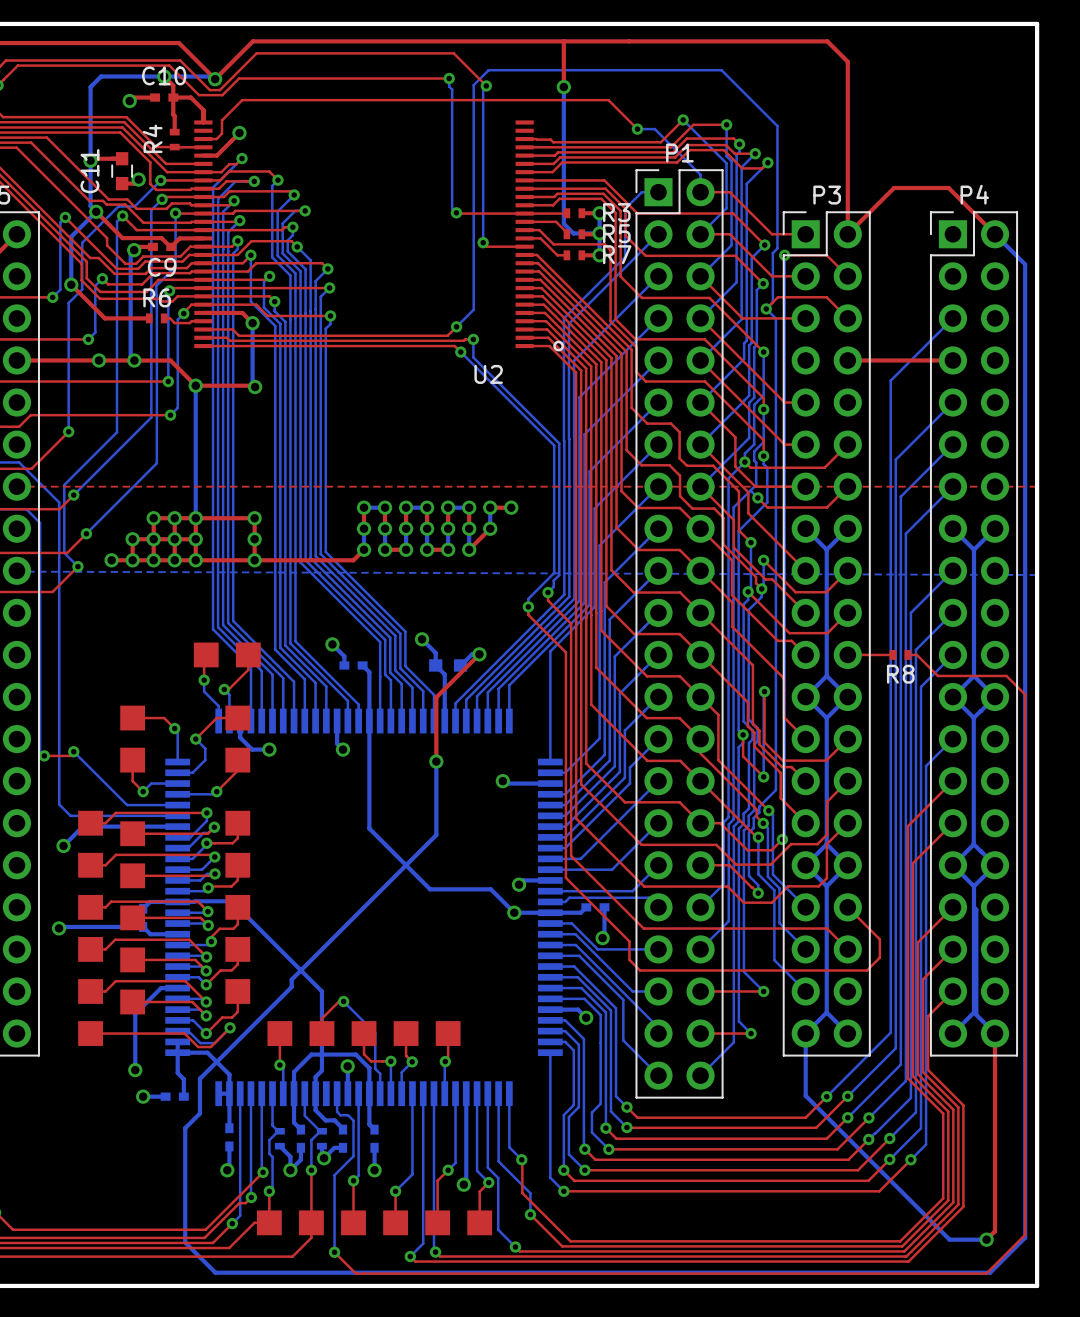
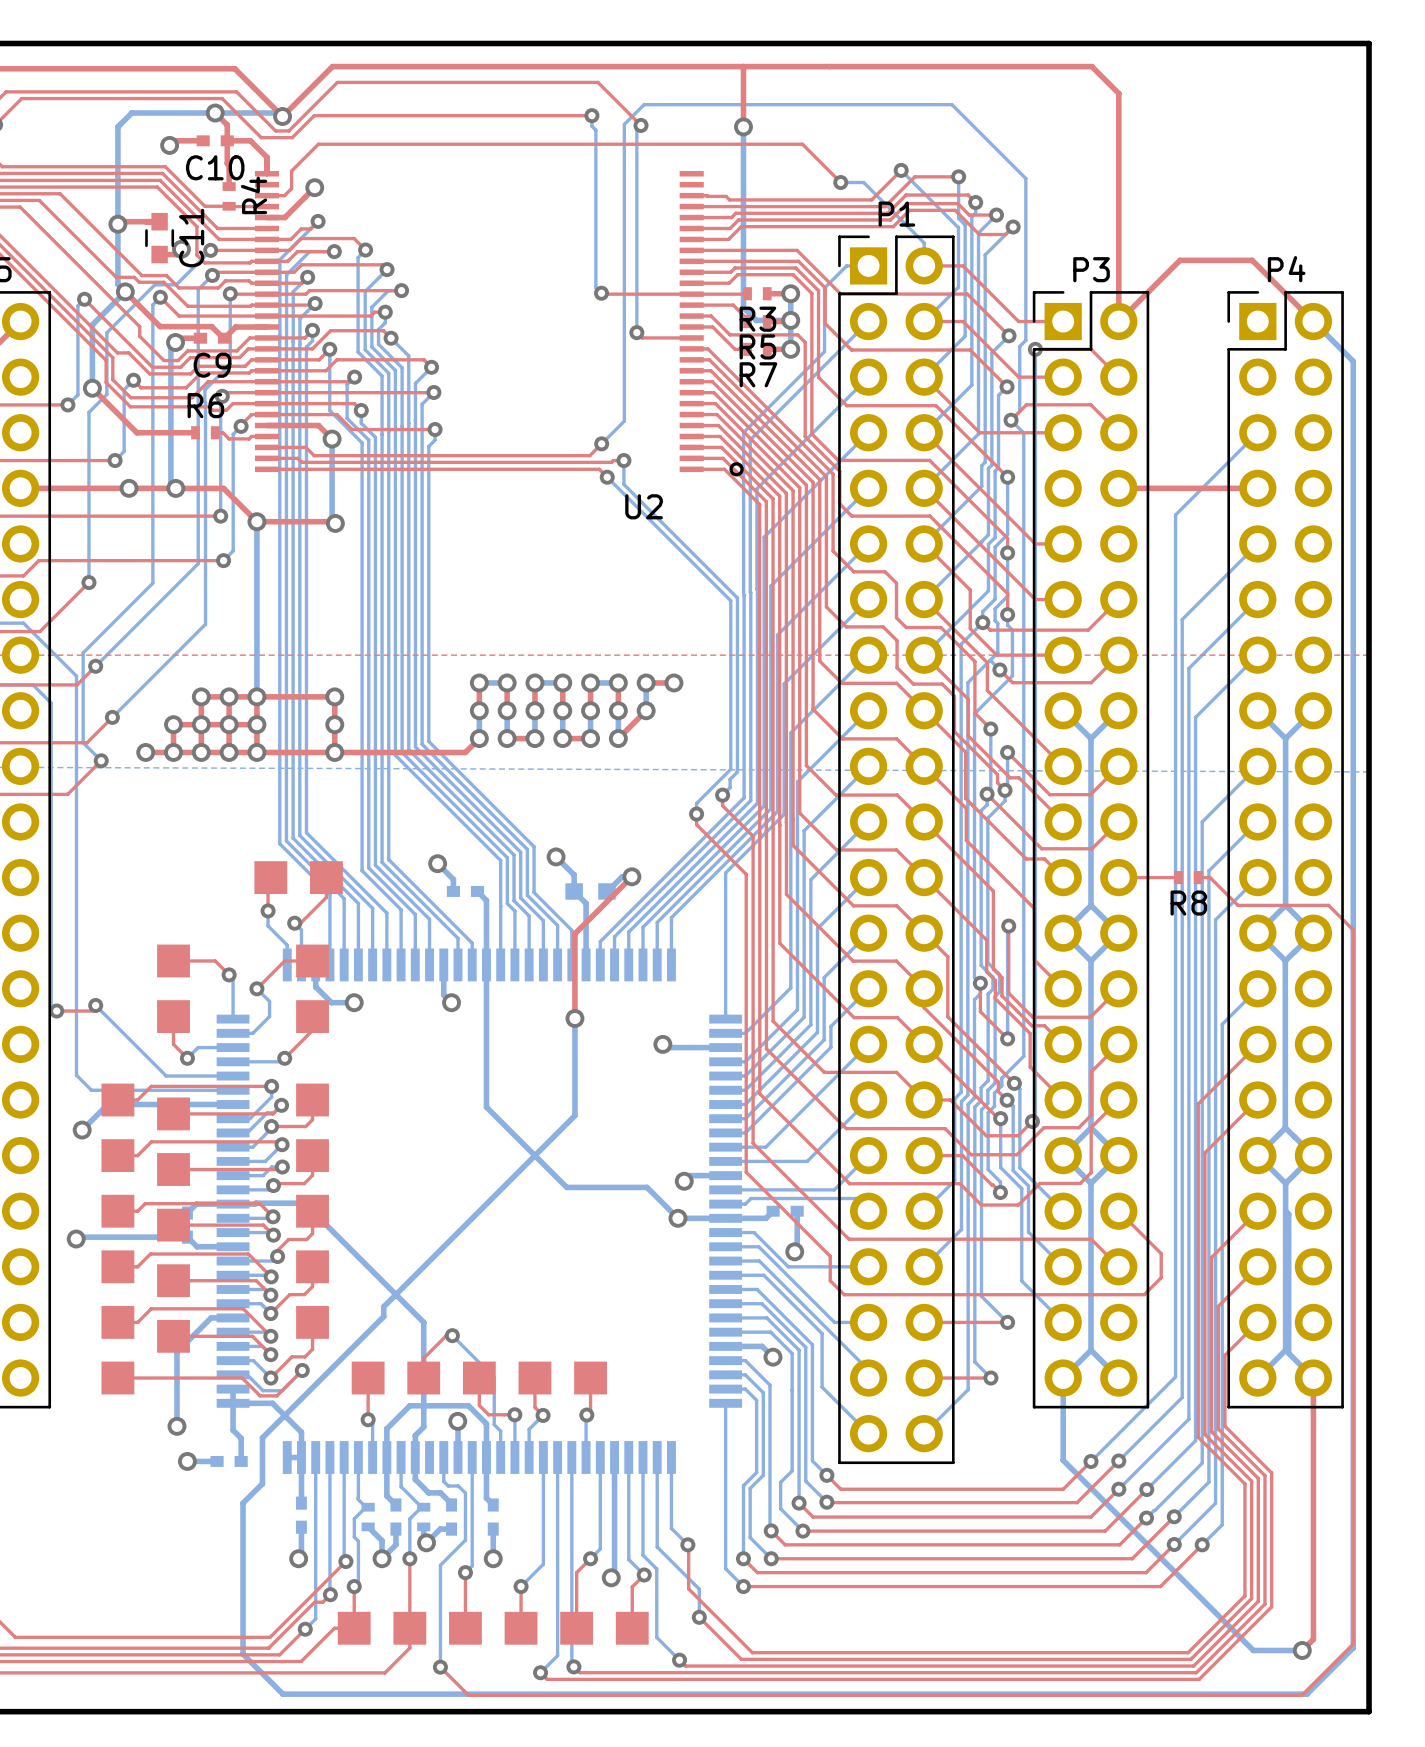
C10 name position: C10 (164, 75) -> C10 (215, 167)
R4 name position: R4 (152, 138) -> R4 (254, 195)
C11 name position: C11 (89, 171) -> C11 (191, 238)
R3 name position: R3 (616, 212) -> R3 (757, 319)
R5 name position: R5 (616, 233) -> R5 (757, 346)
R7 name position: R7 (617, 254) -> R7 (758, 374)

